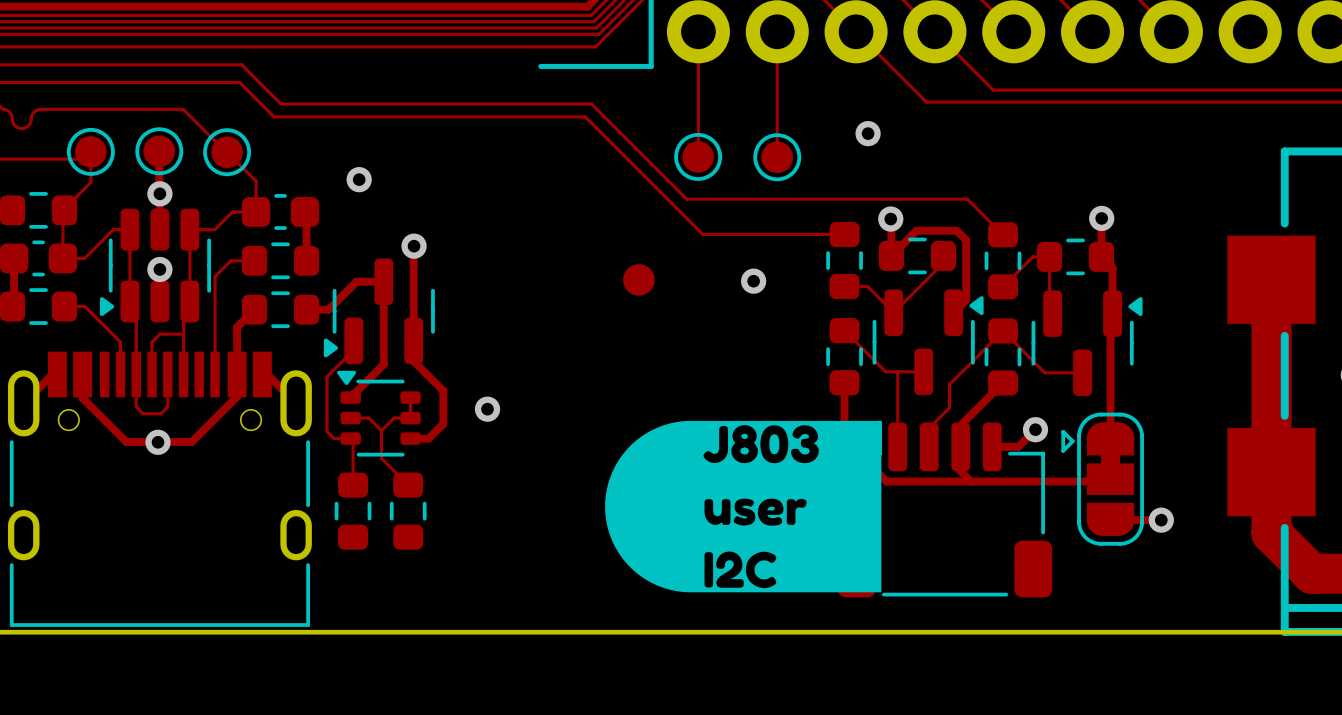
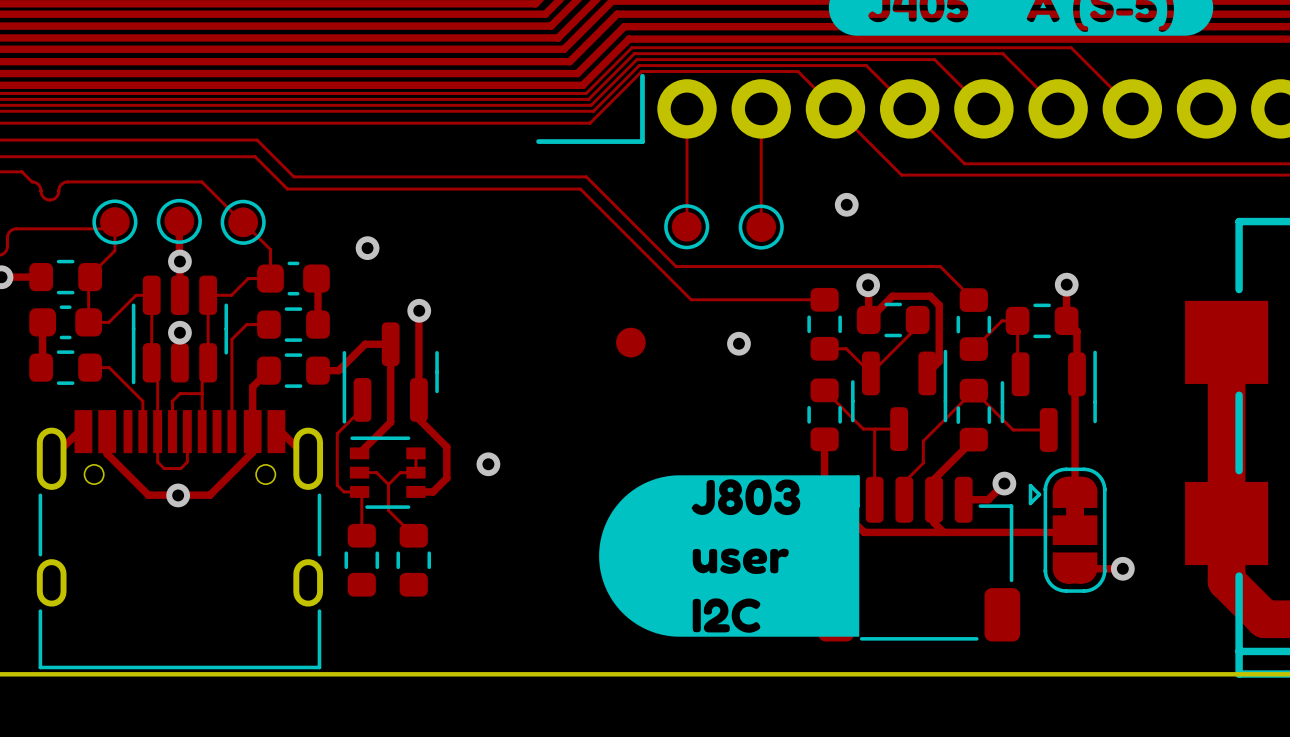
part footprint: [100, 208, 211, 323] -> [131, 275, 229, 385]
part footprint: [323, 258, 435, 365] -> [342, 322, 439, 424]
part footprint: [872, 289, 984, 396] -> [851, 349, 948, 451]
part footprint: [1031, 290, 1143, 397] -> [1000, 350, 1097, 452]
part footprint: [337, 370, 421, 457] -> [349, 436, 426, 509]

